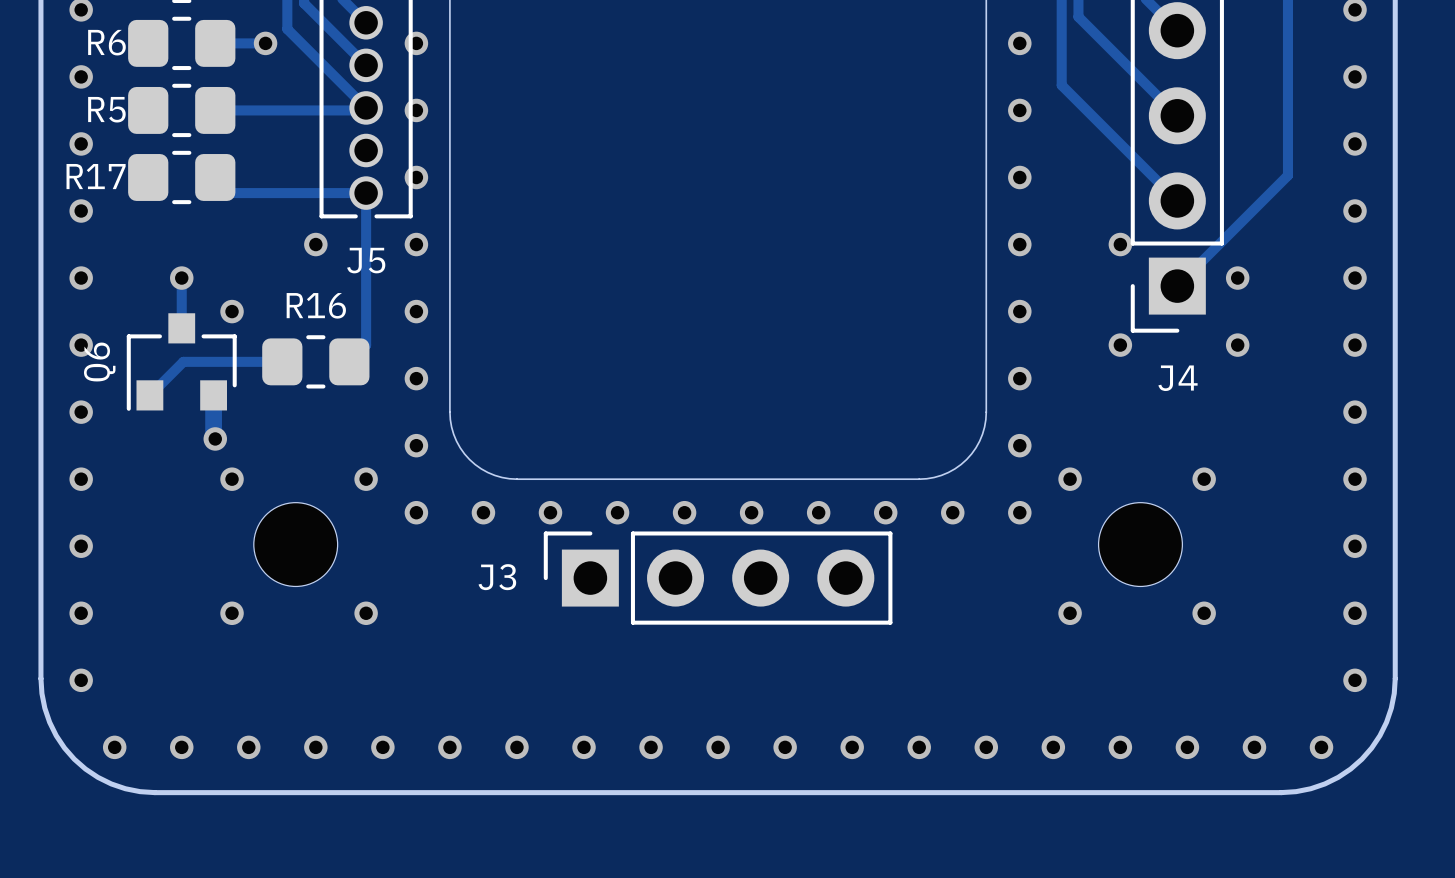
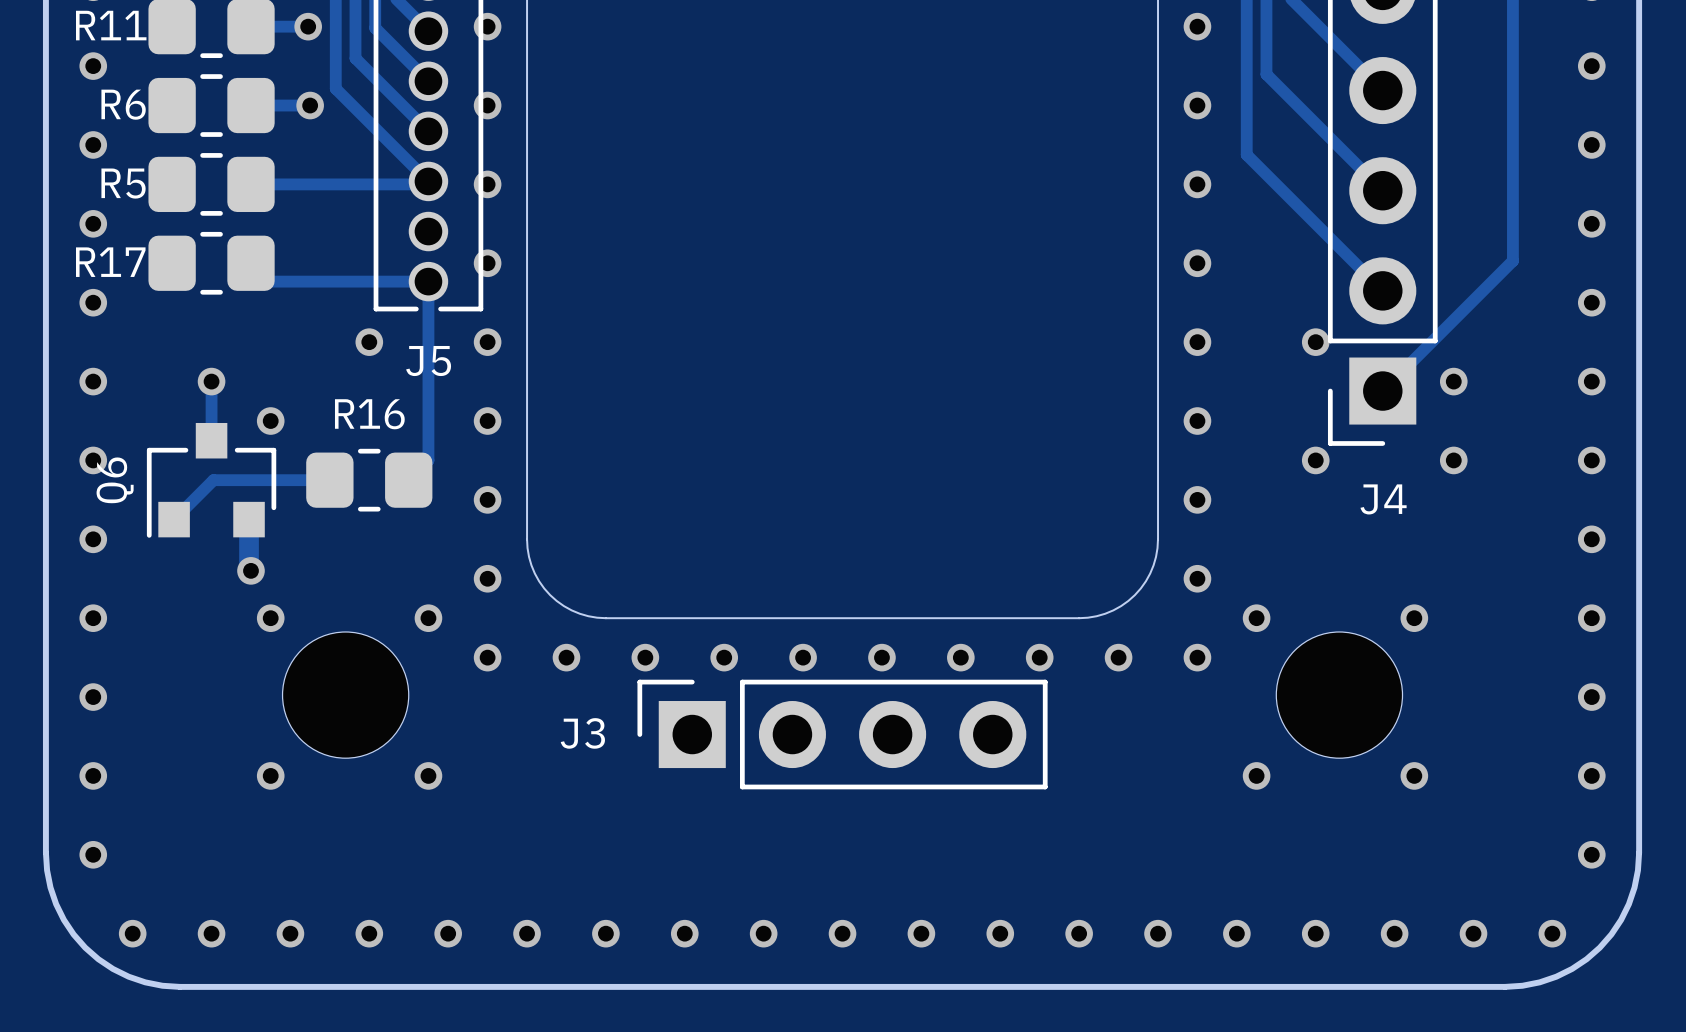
part footprint: [253, 502, 338, 587] -> [282, 631, 409, 759]
part footprint: [1098, 502, 1183, 587] -> [1276, 631, 1403, 759]

